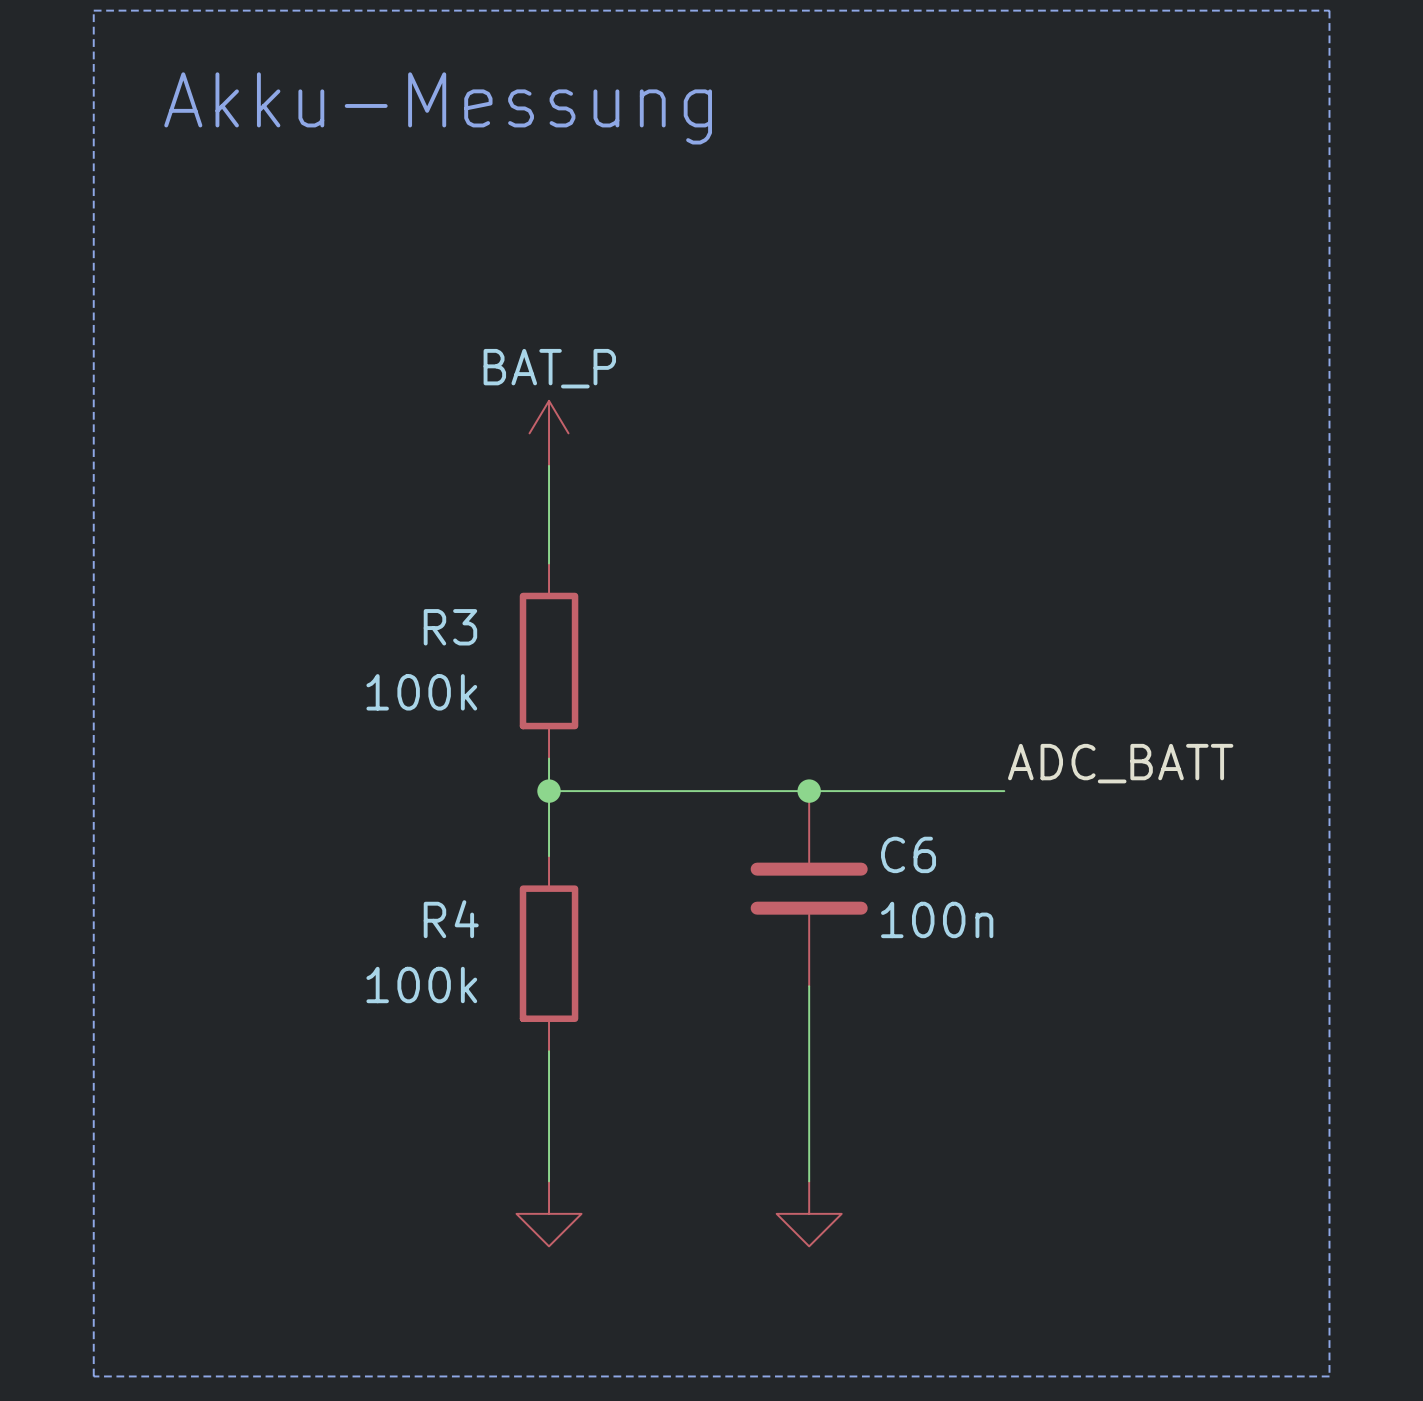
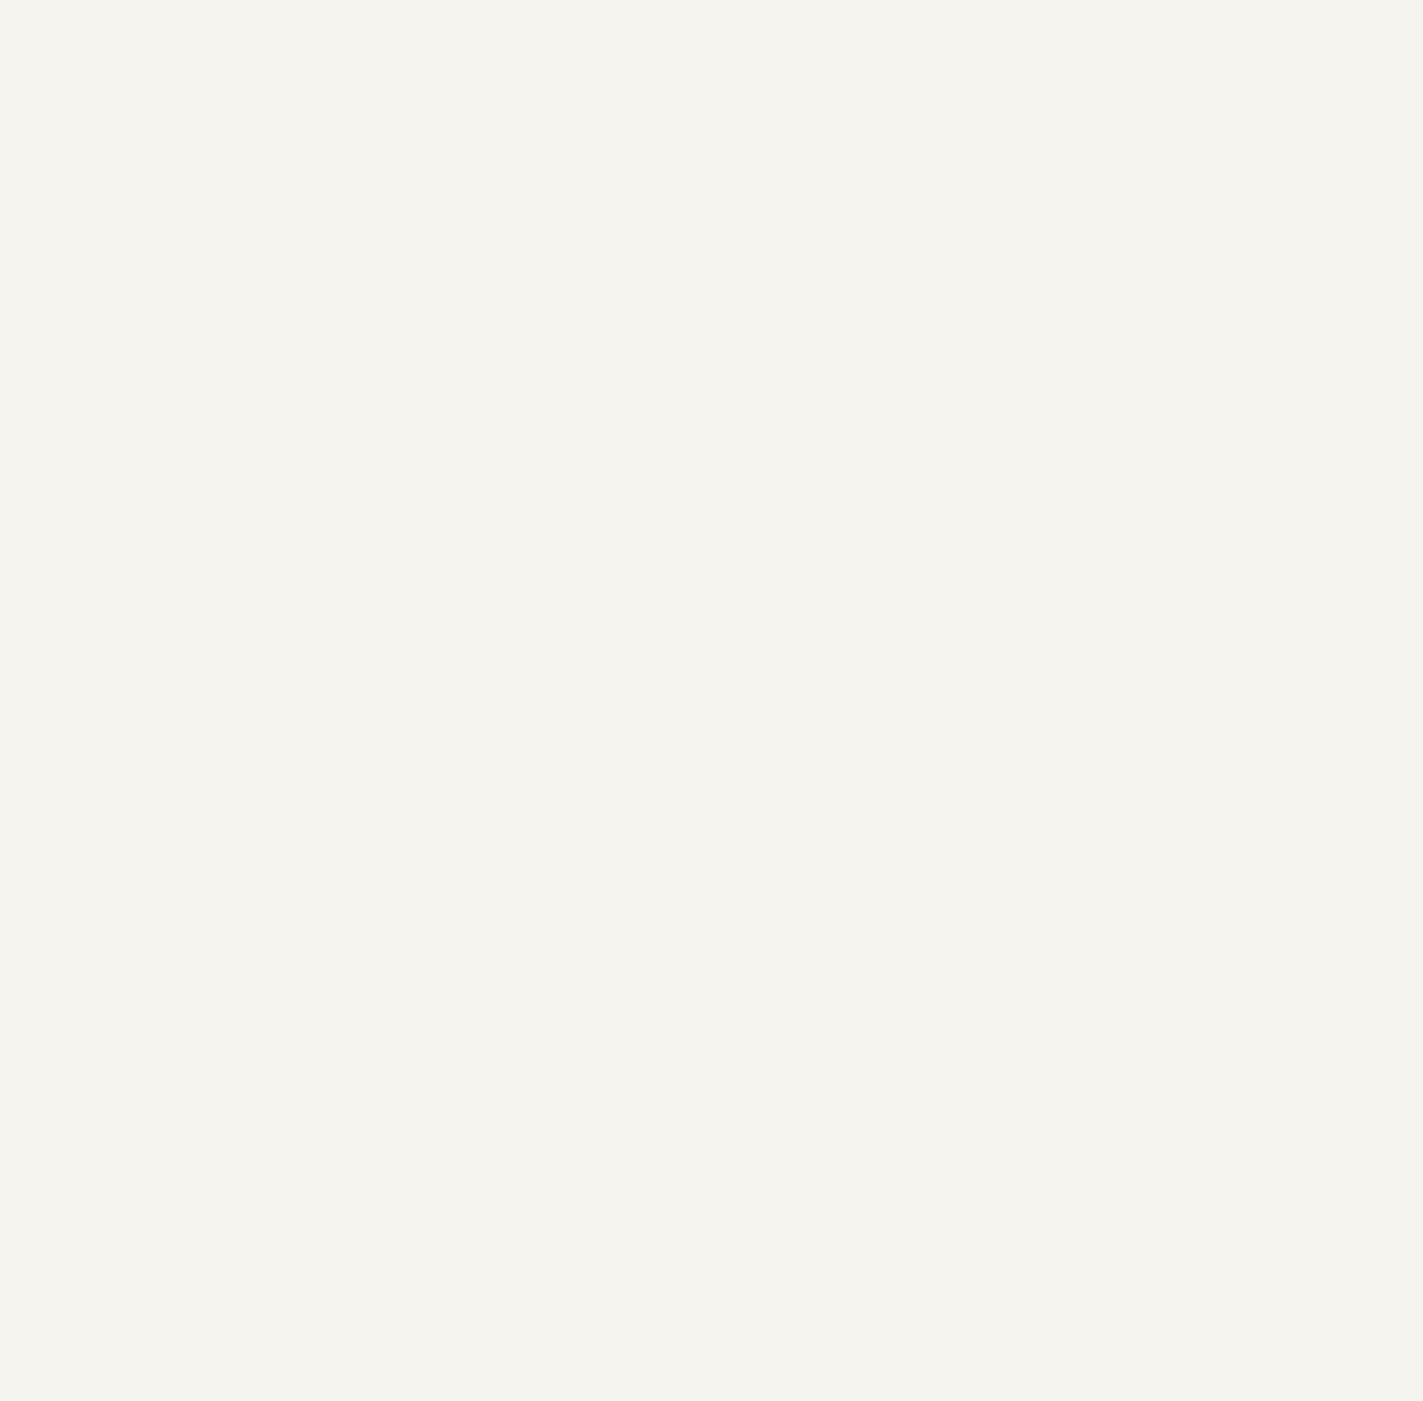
line: (93, 10) (1329, 10) (1329, 1376) (93, 1376) (93, 10) -> none
text: Akku-Messung (438, 108) -> none
power symbol: BAT_P (549, 433) -> none
wire: (549, 465) (549, 563) -> none
R3: 100k (549, 661) -> none
wire: (549, 758) (549, 856) -> none
label: ADC_BATT (1120, 763) -> none
wire: (549, 791) (1004, 791) -> none
junction: (549, 791) -> none
junction: (809, 791) -> none
C6: 100n (809, 888) -> none
R4: 100k (549, 953) -> none
wire: (809, 986) (809, 1181) -> none
wire: (549, 1051) (549, 1181) -> none
power symbol: (549, 1213) -> none
power symbol: (809, 1213) -> none

